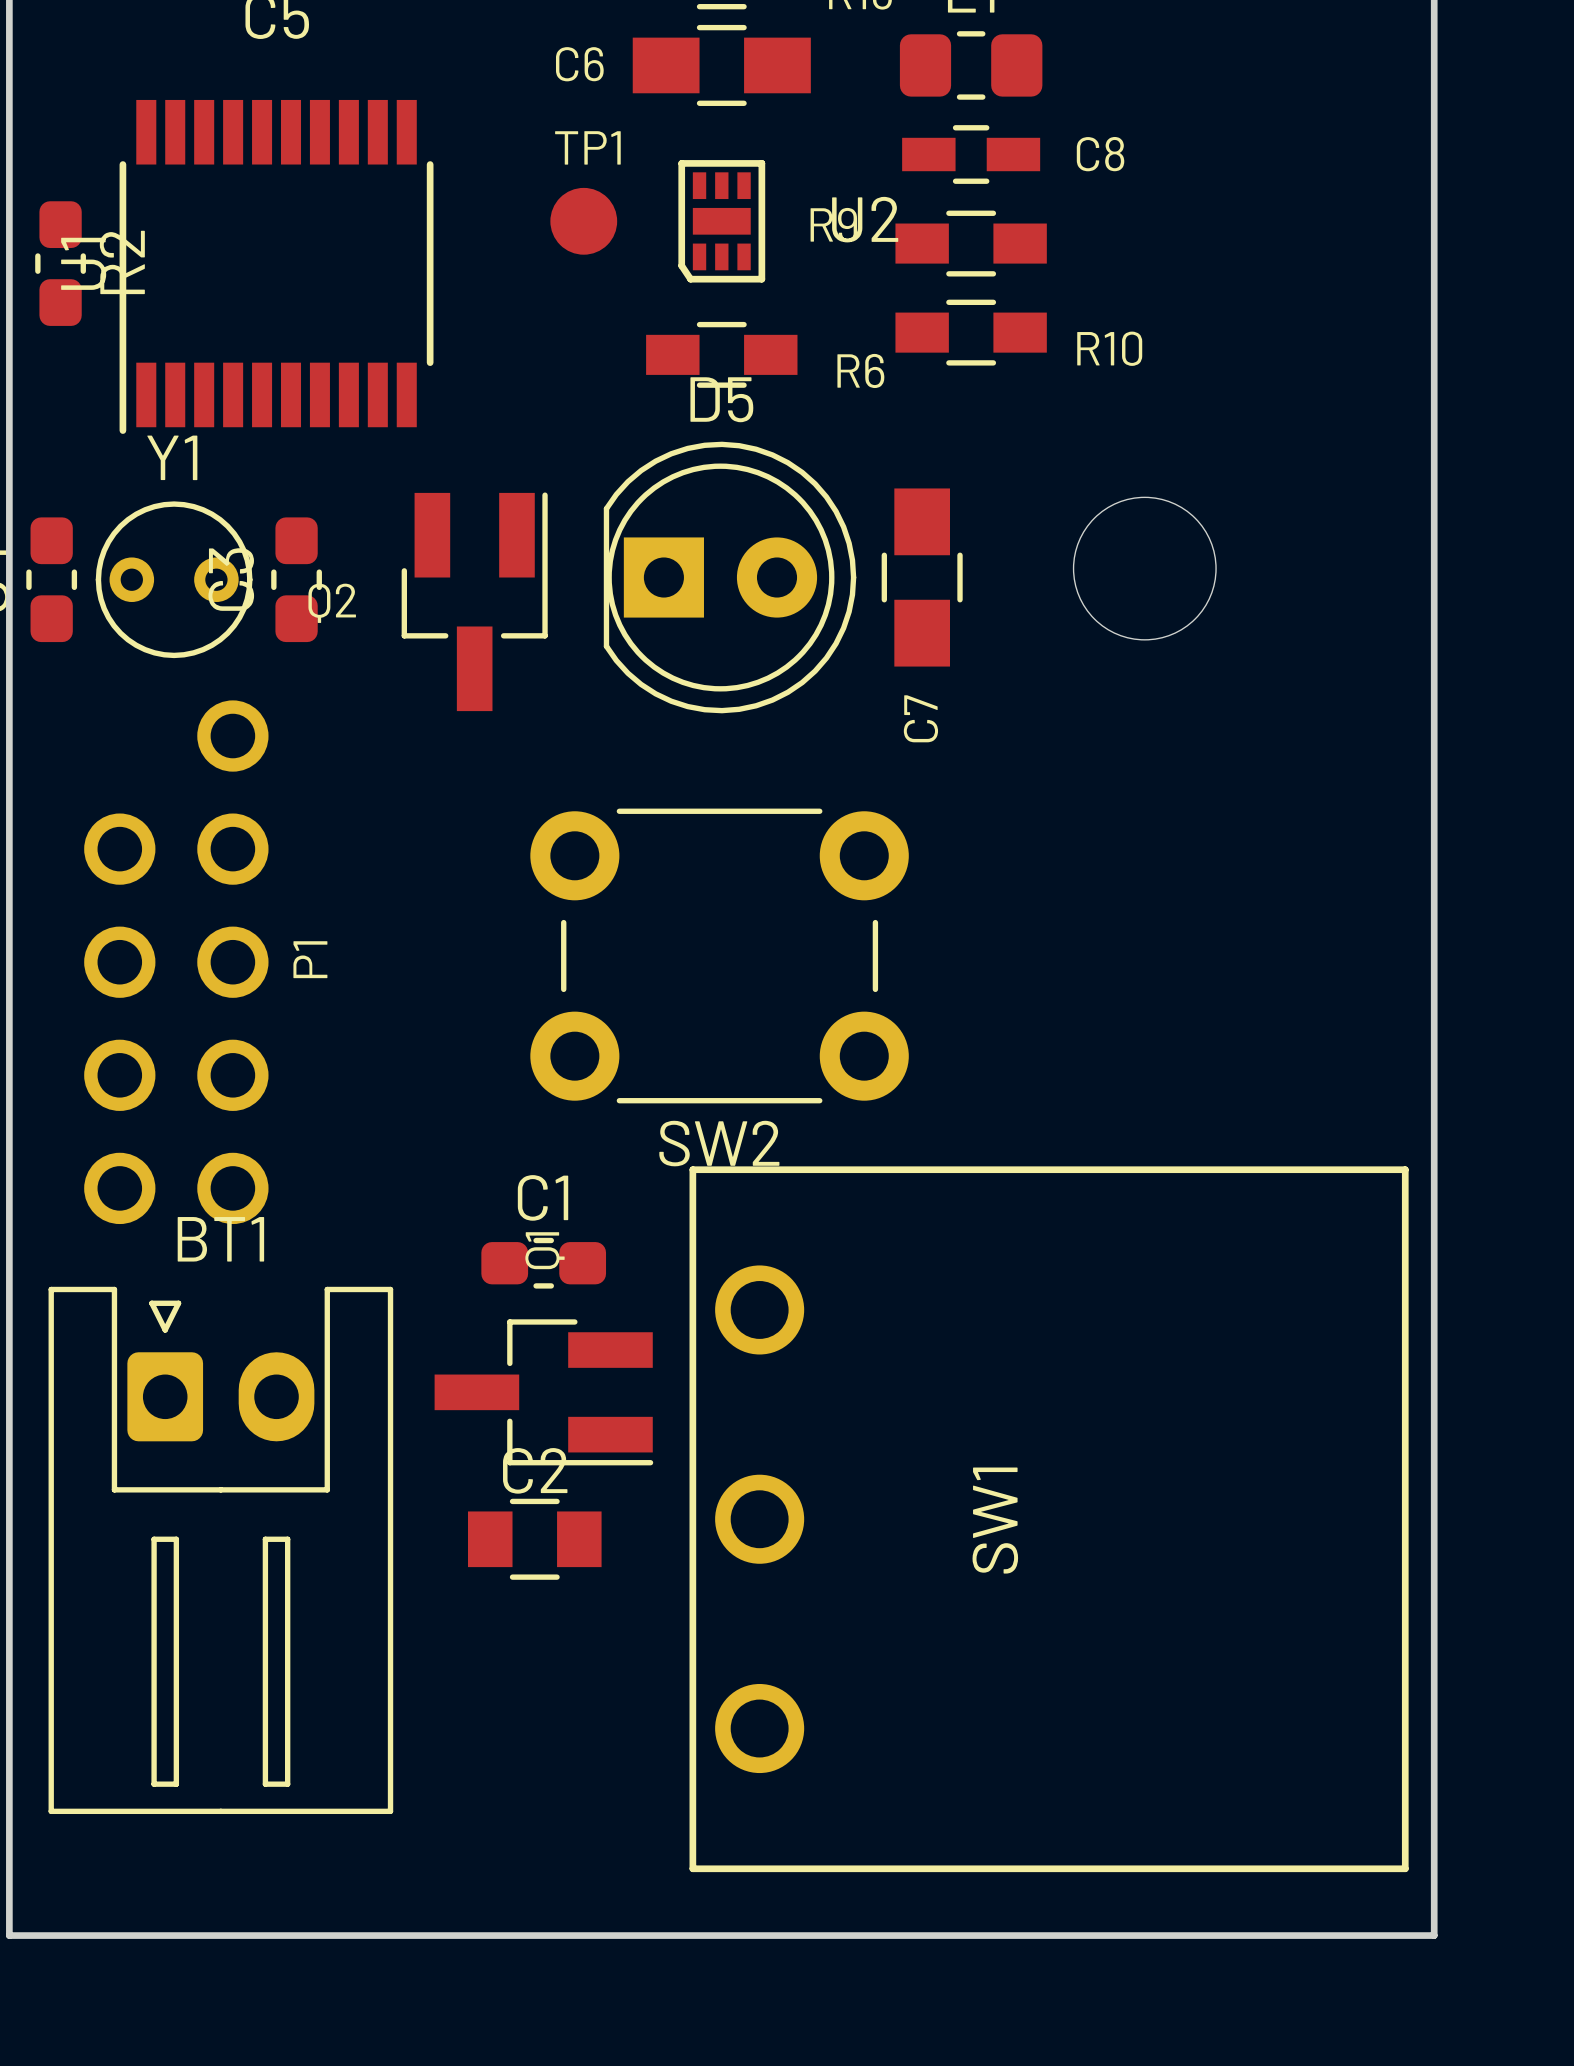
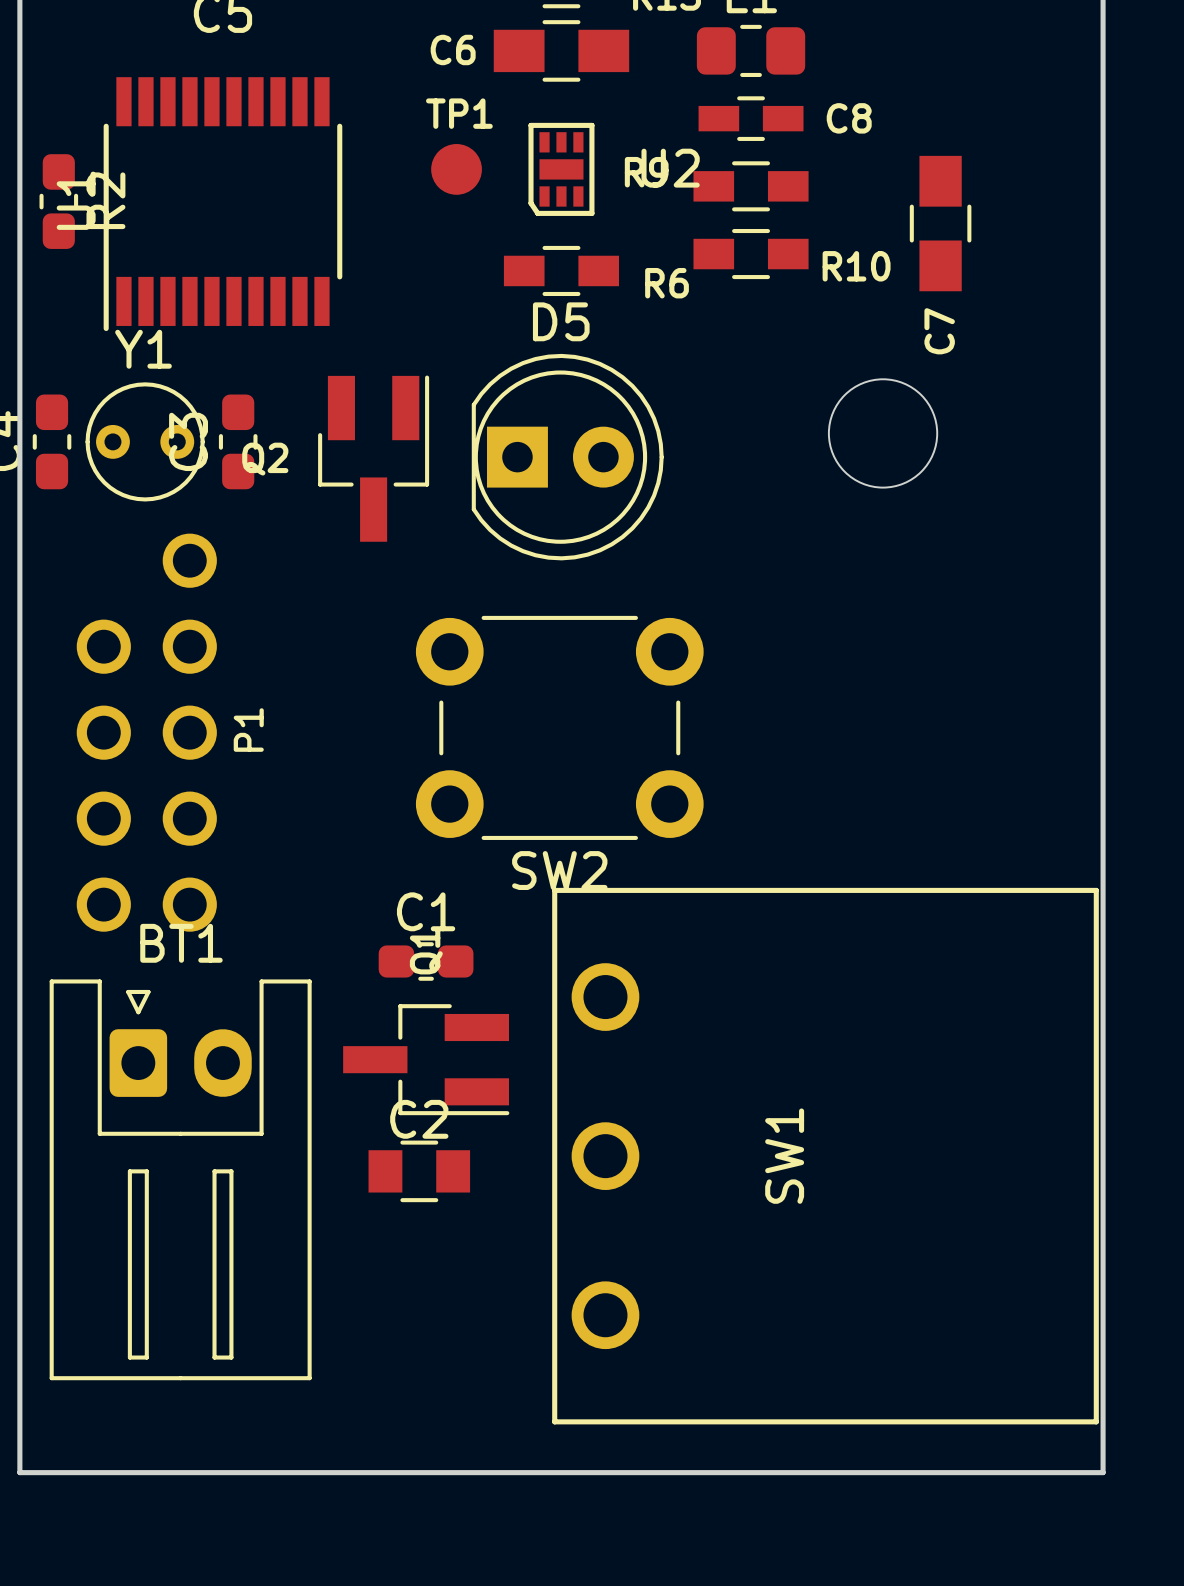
D5 position: (730, 577) -> (567, 457)
C7 position: (922, 577) -> (940, 223)
SW1 position: (1049, 1519) -> (825, 1156)

